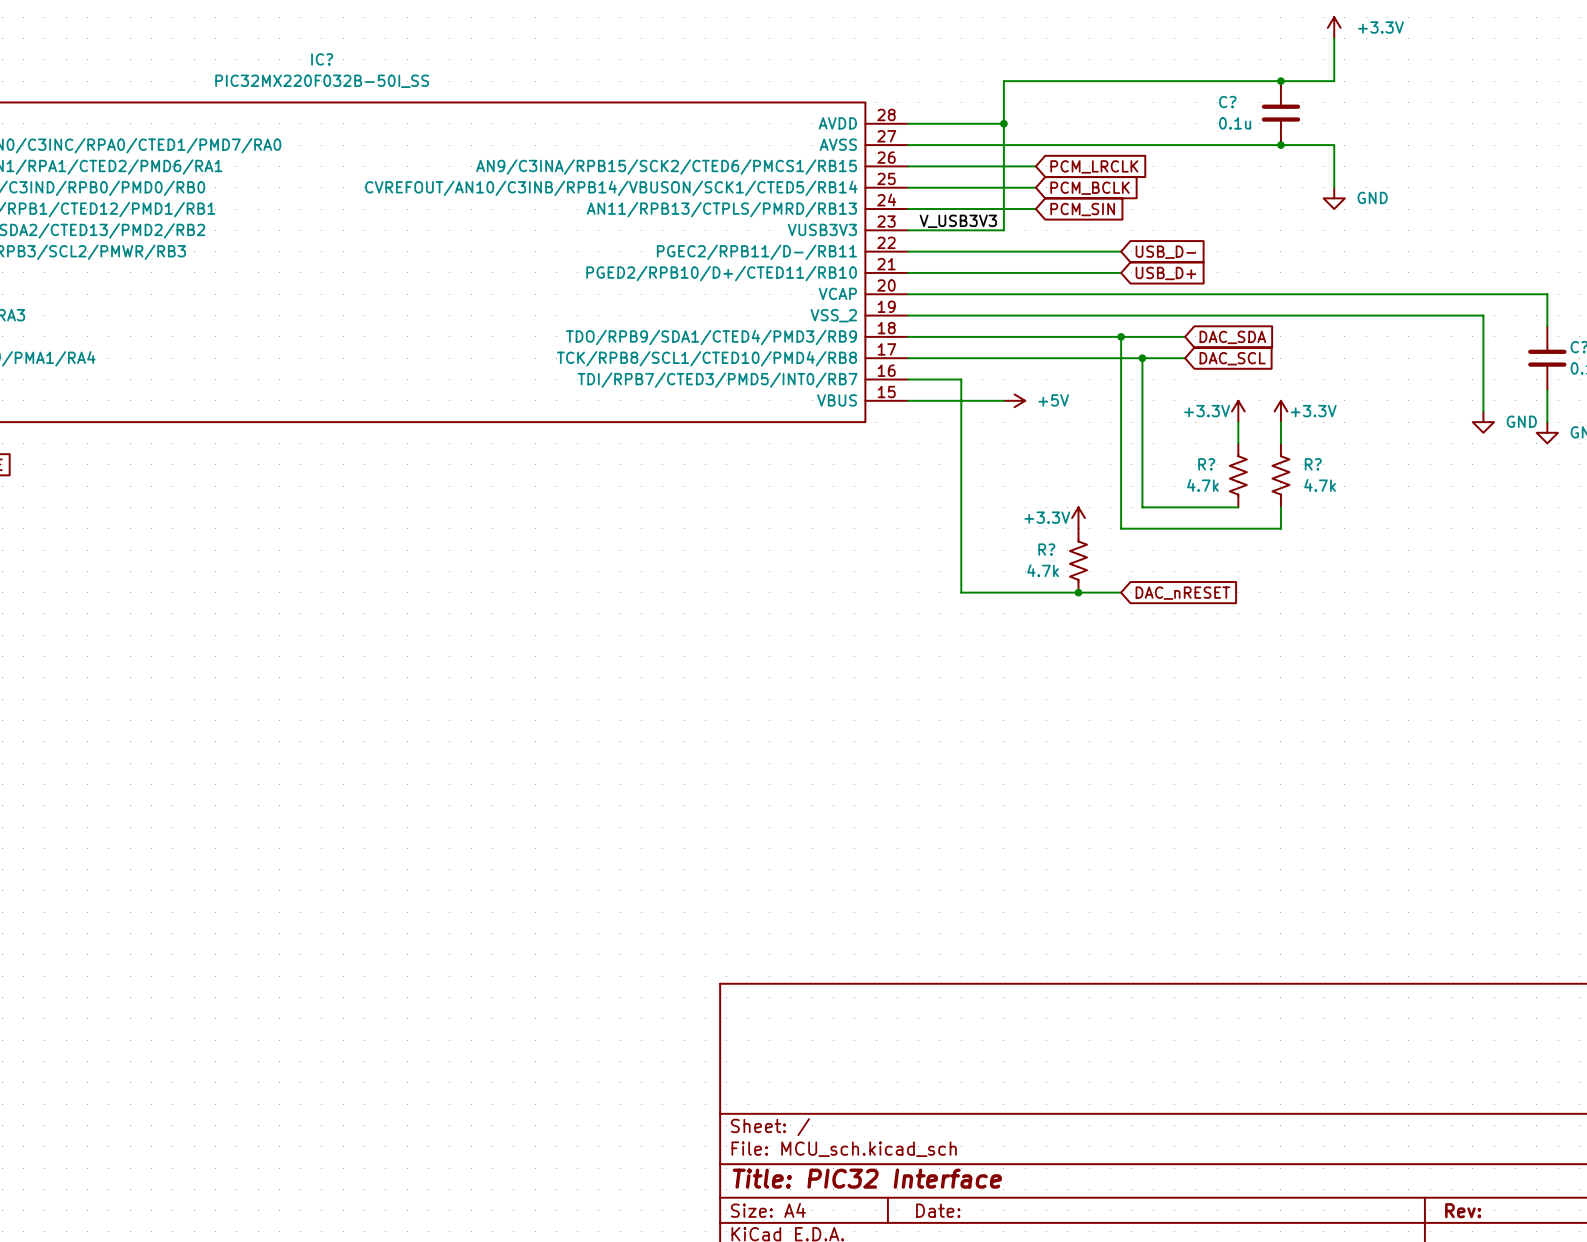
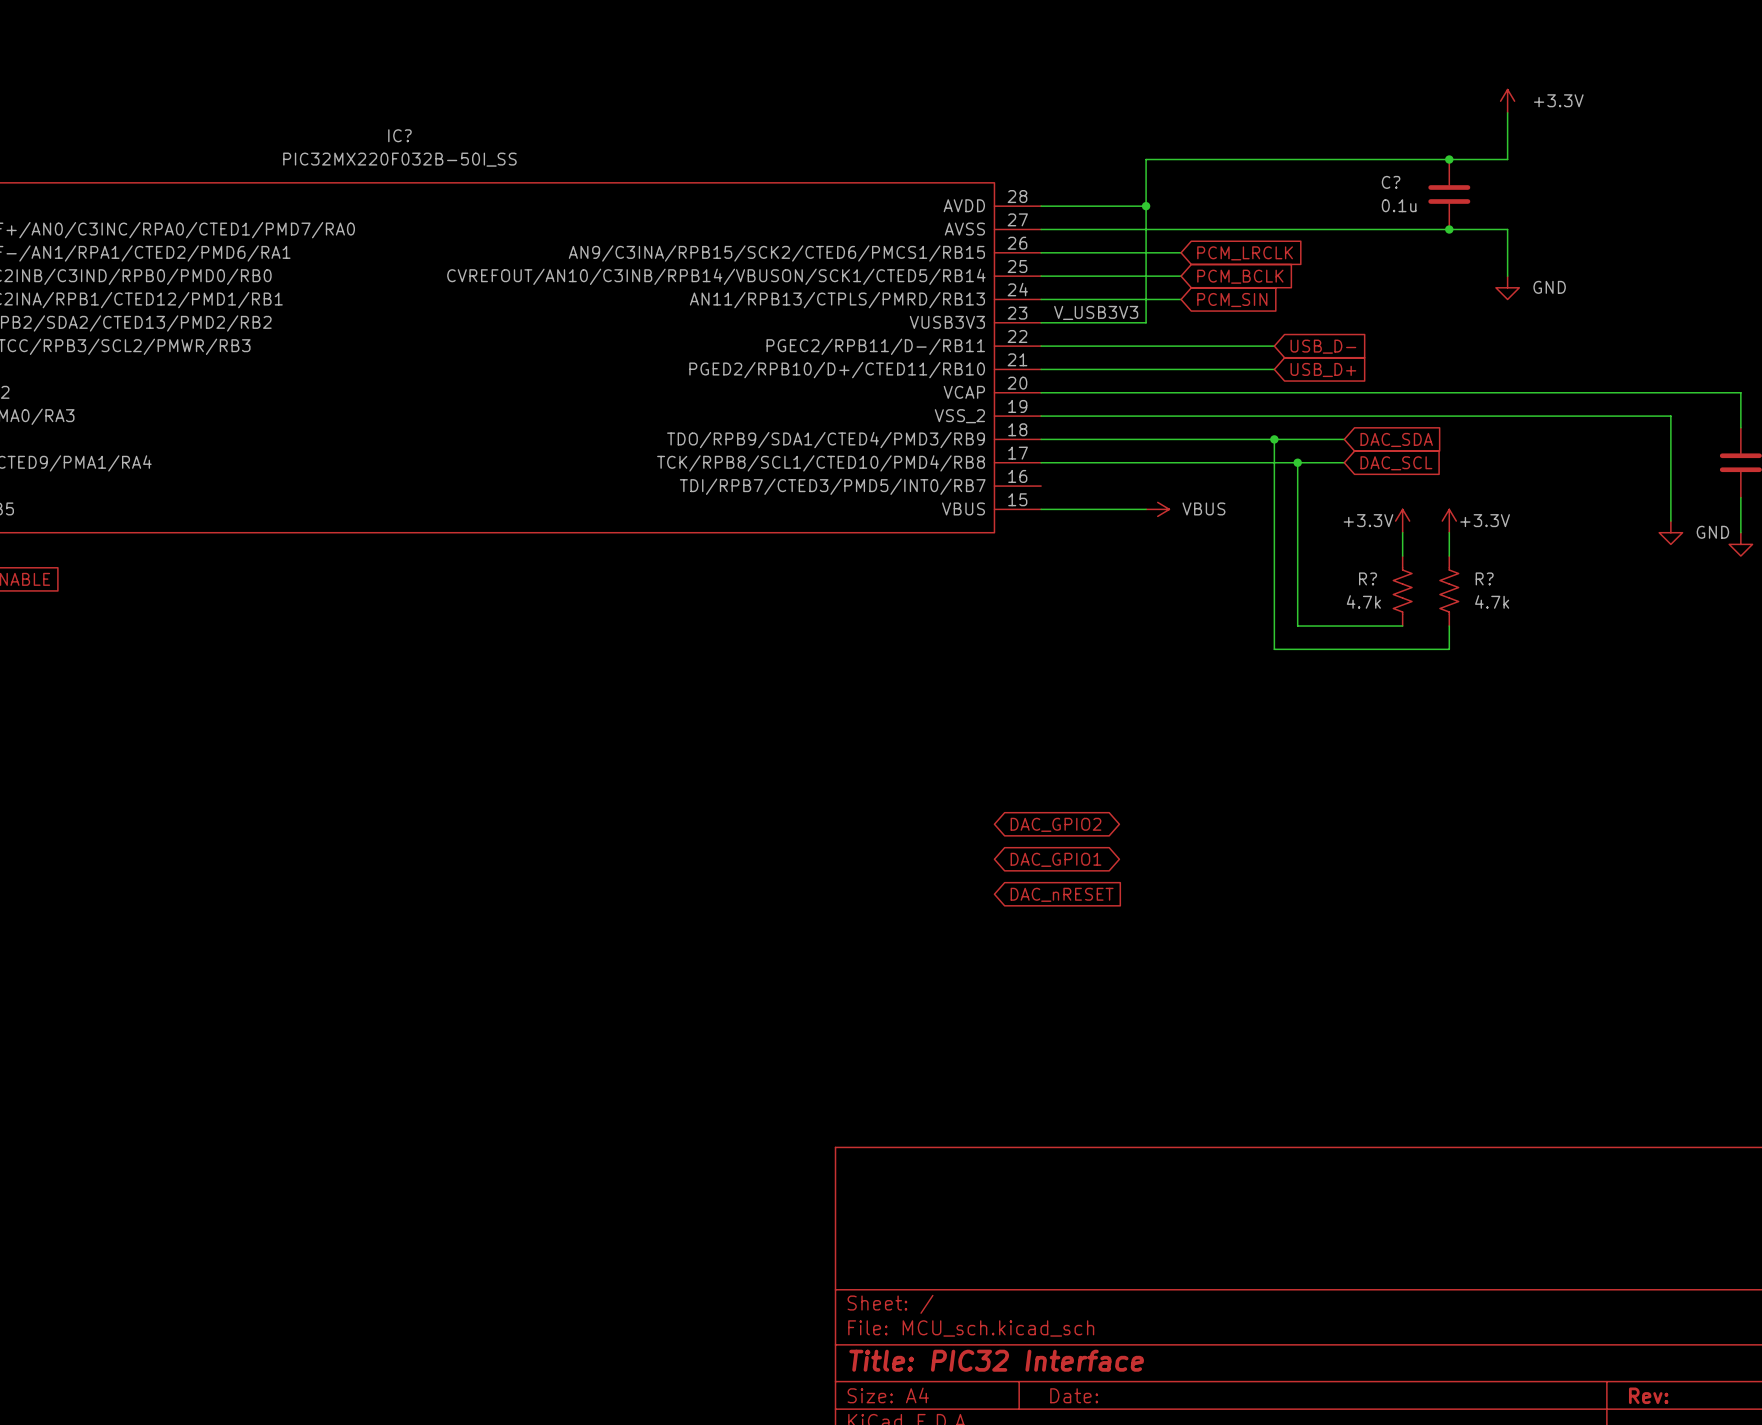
wire: (908, 379) (961, 379) (961, 592) (1121, 592) -> none
power symbol: +5V (1014, 400) -> VBUS (1157, 509)
power symbol: +3.3V (1078, 518) -> none
R?: 4.7k (1078, 560) -> none
junction: (1078, 592) -> none
global label: DAC_nRESET (1182, 593) -> none
global label: none -> DAC_GPIO2 (1055, 824)
global label: none -> DAC_GPIO1 (1055, 859)
global label: none -> DAC_nRESET (1062, 894)

